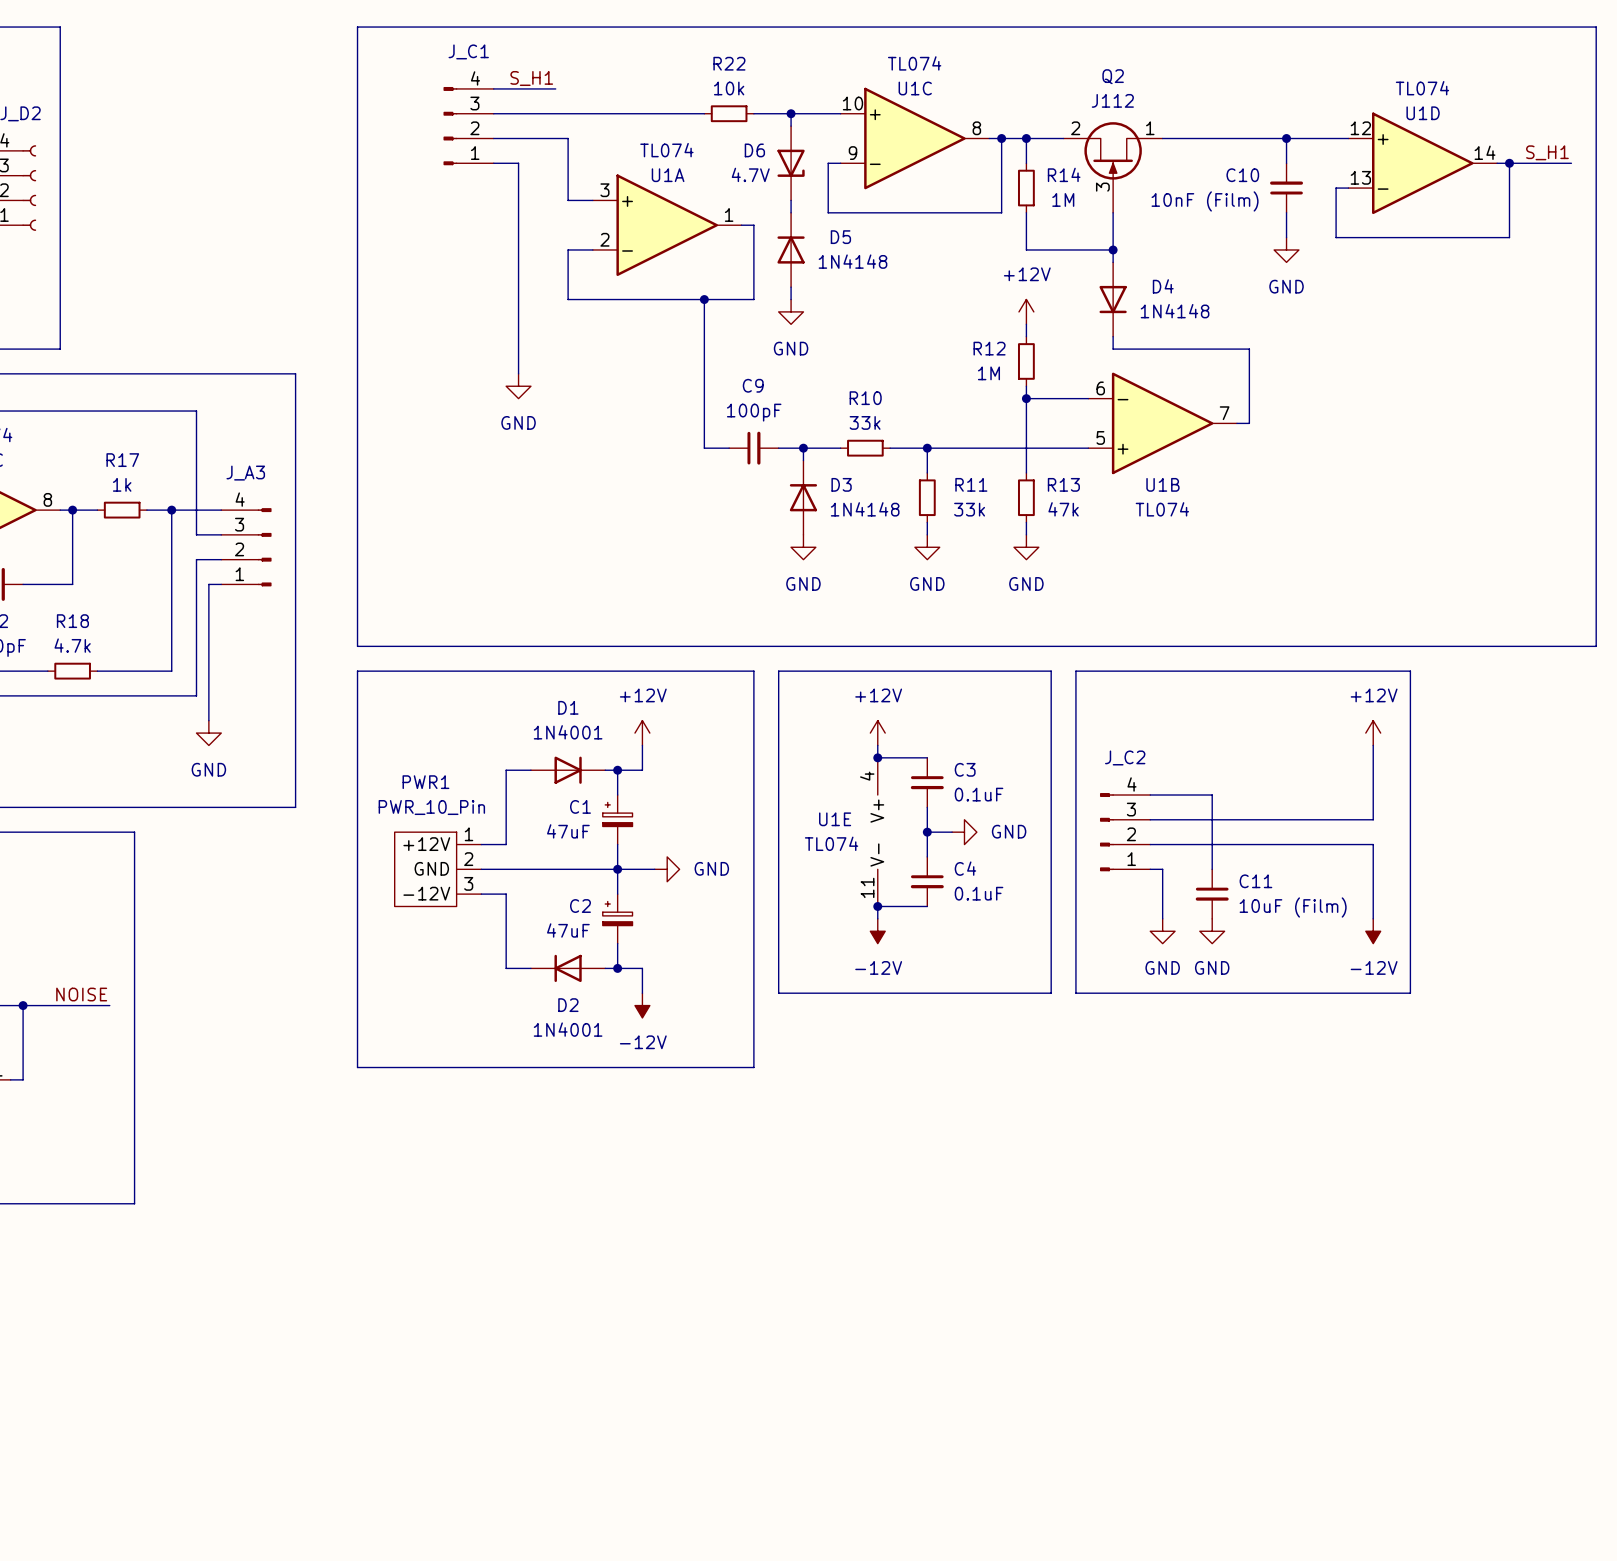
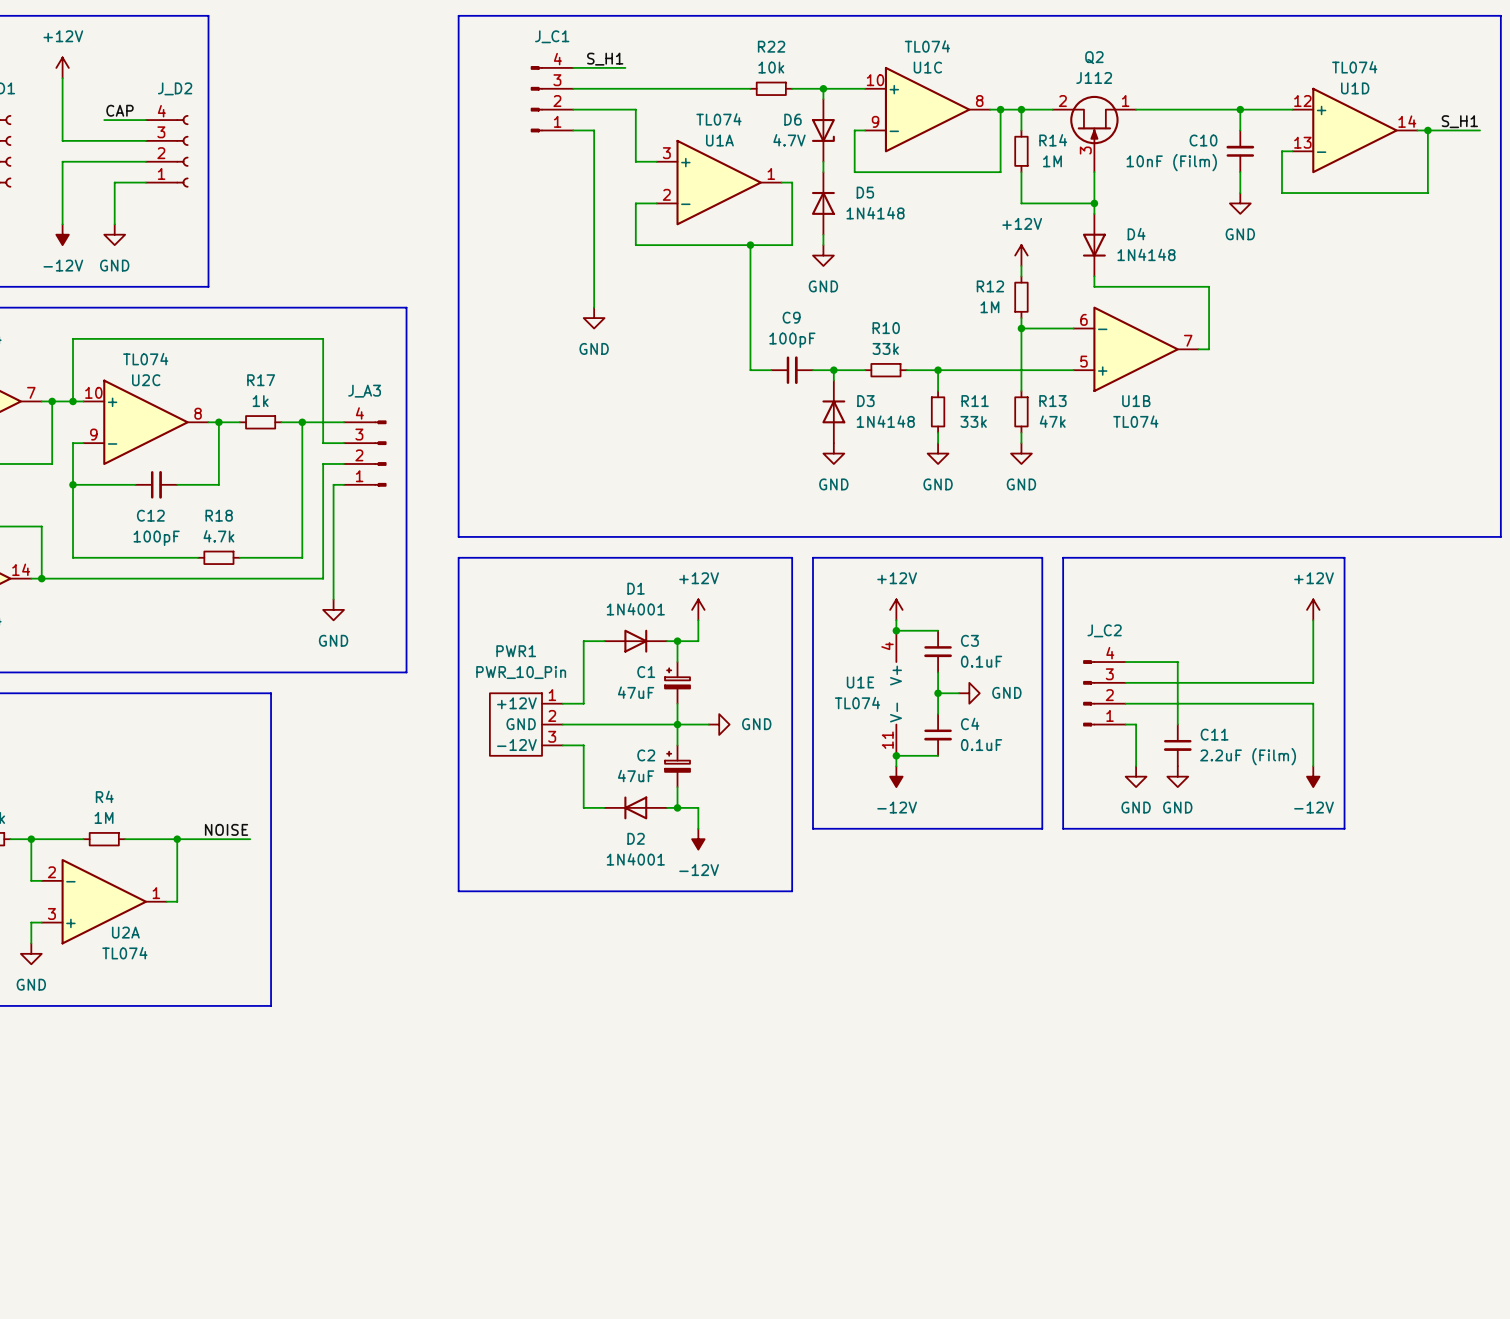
C11 value: 10uF (Film) (1293, 907) -> 2.2uF (Film) (1248, 756)

